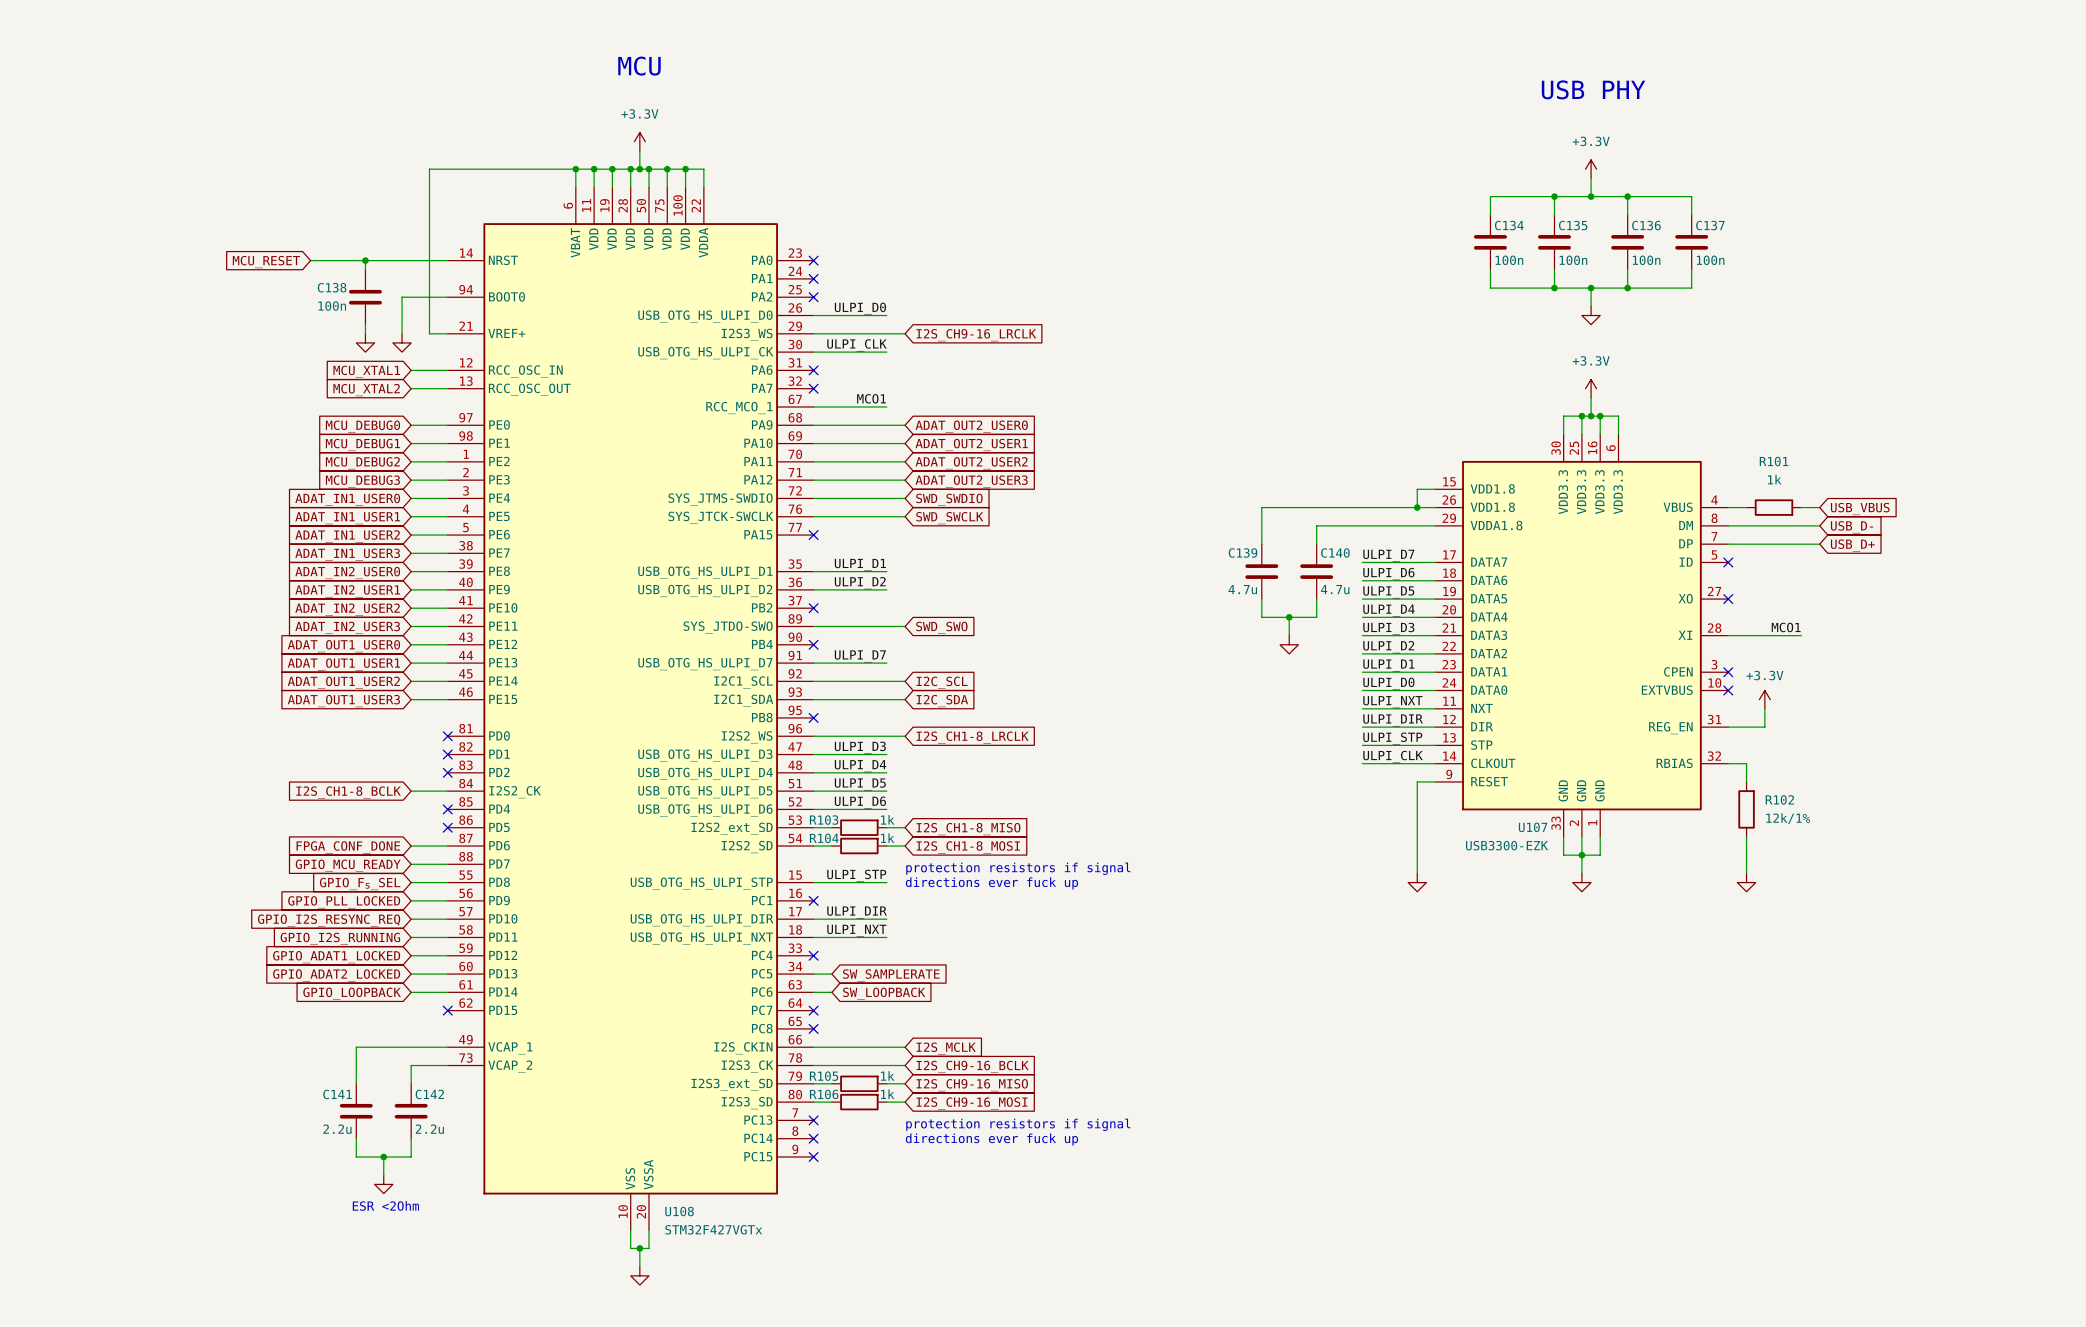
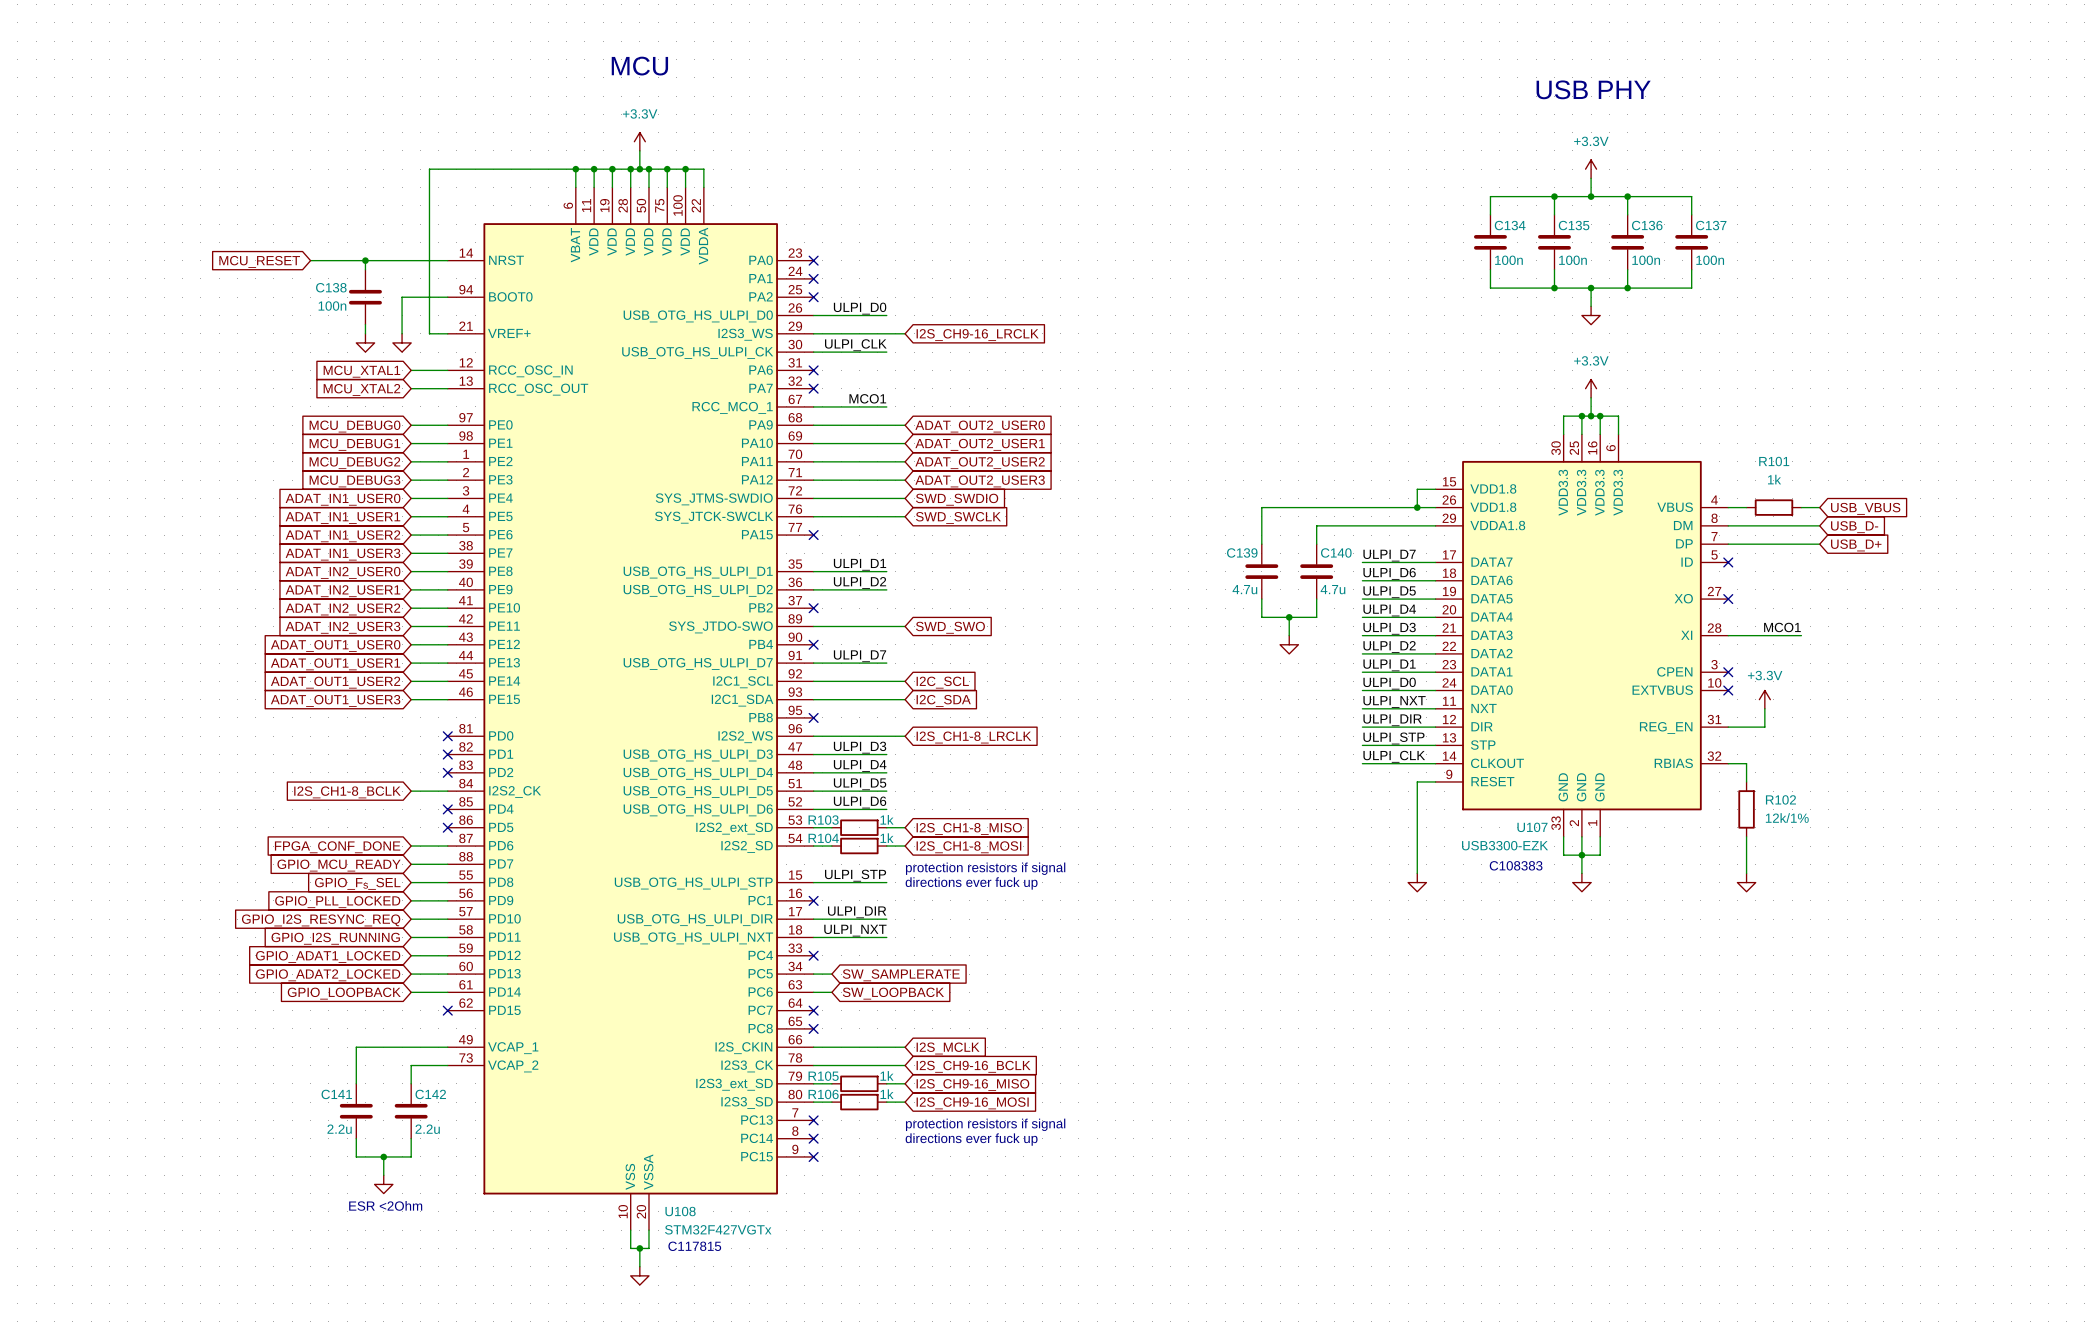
text: none -> C108383 (1516, 865)
text: none -> C117815 (694, 1246)

